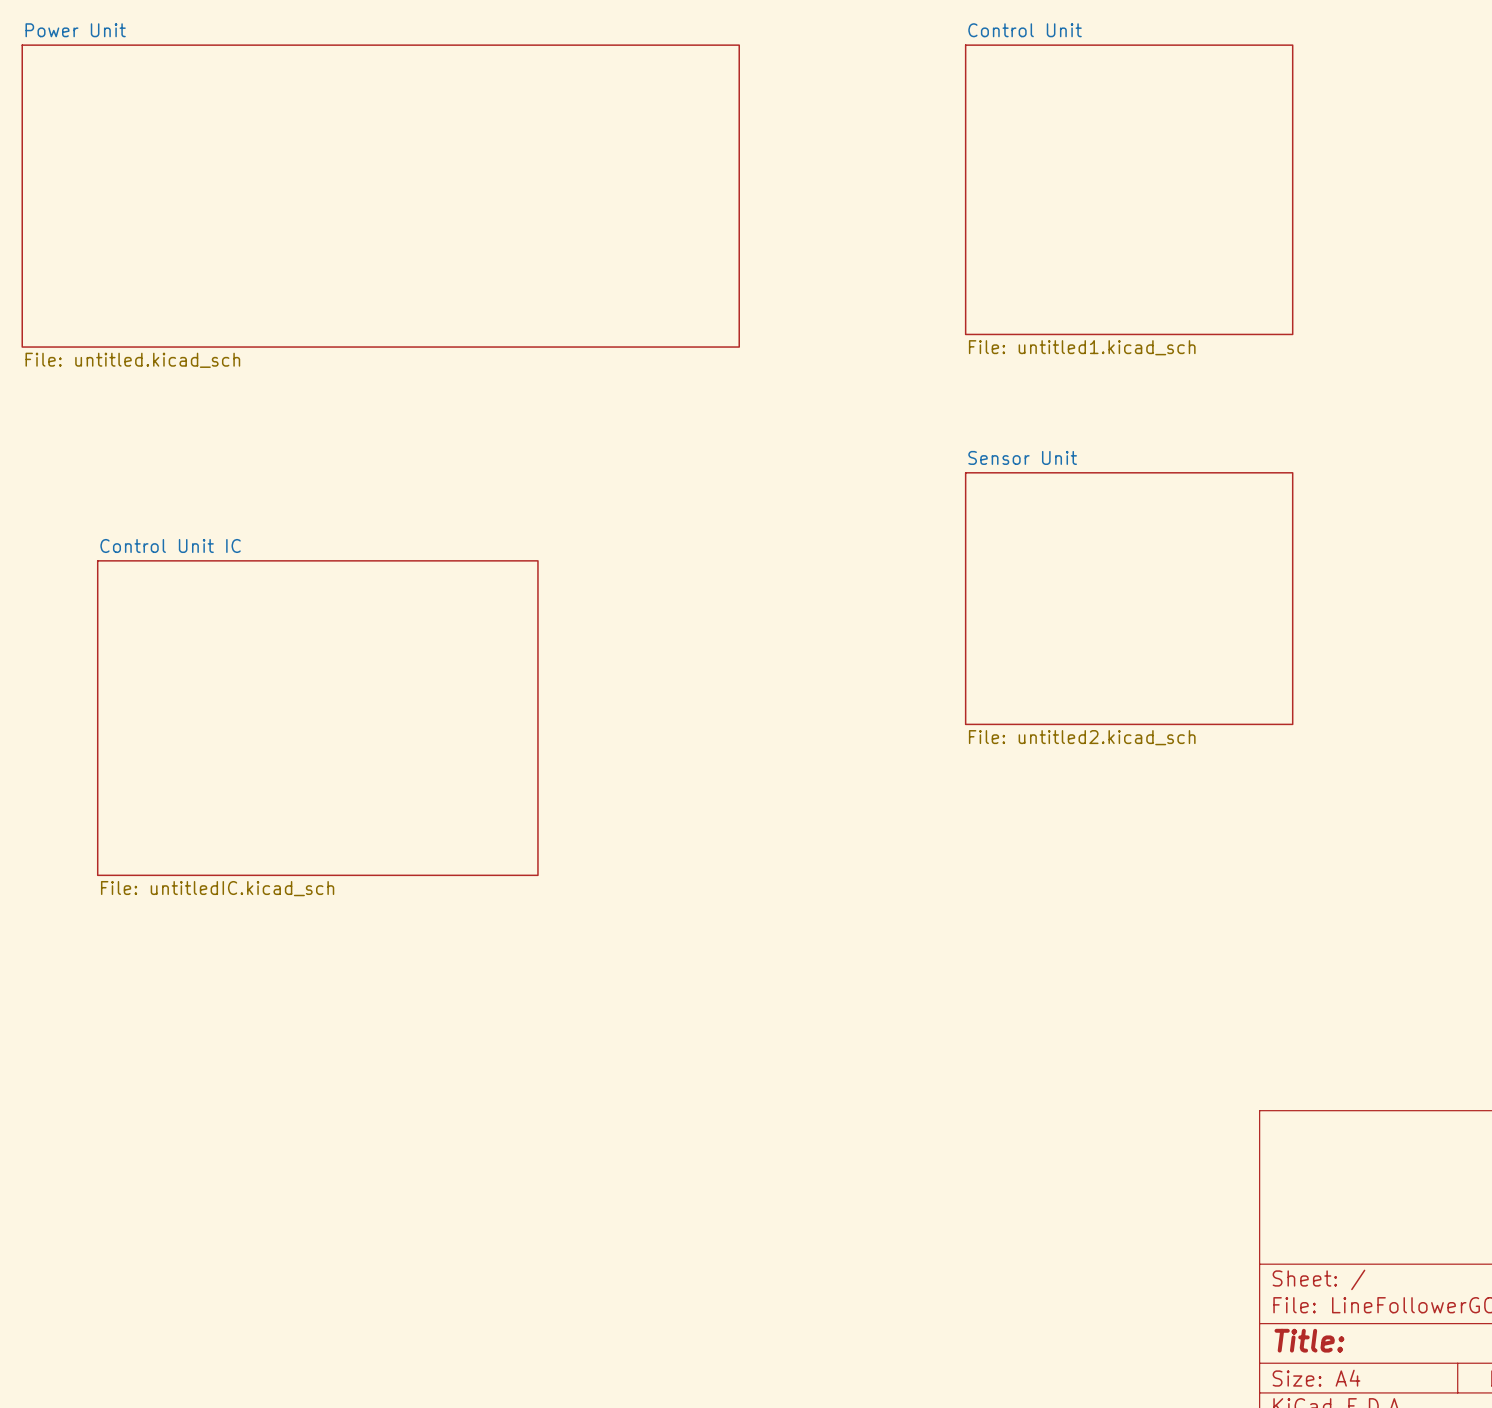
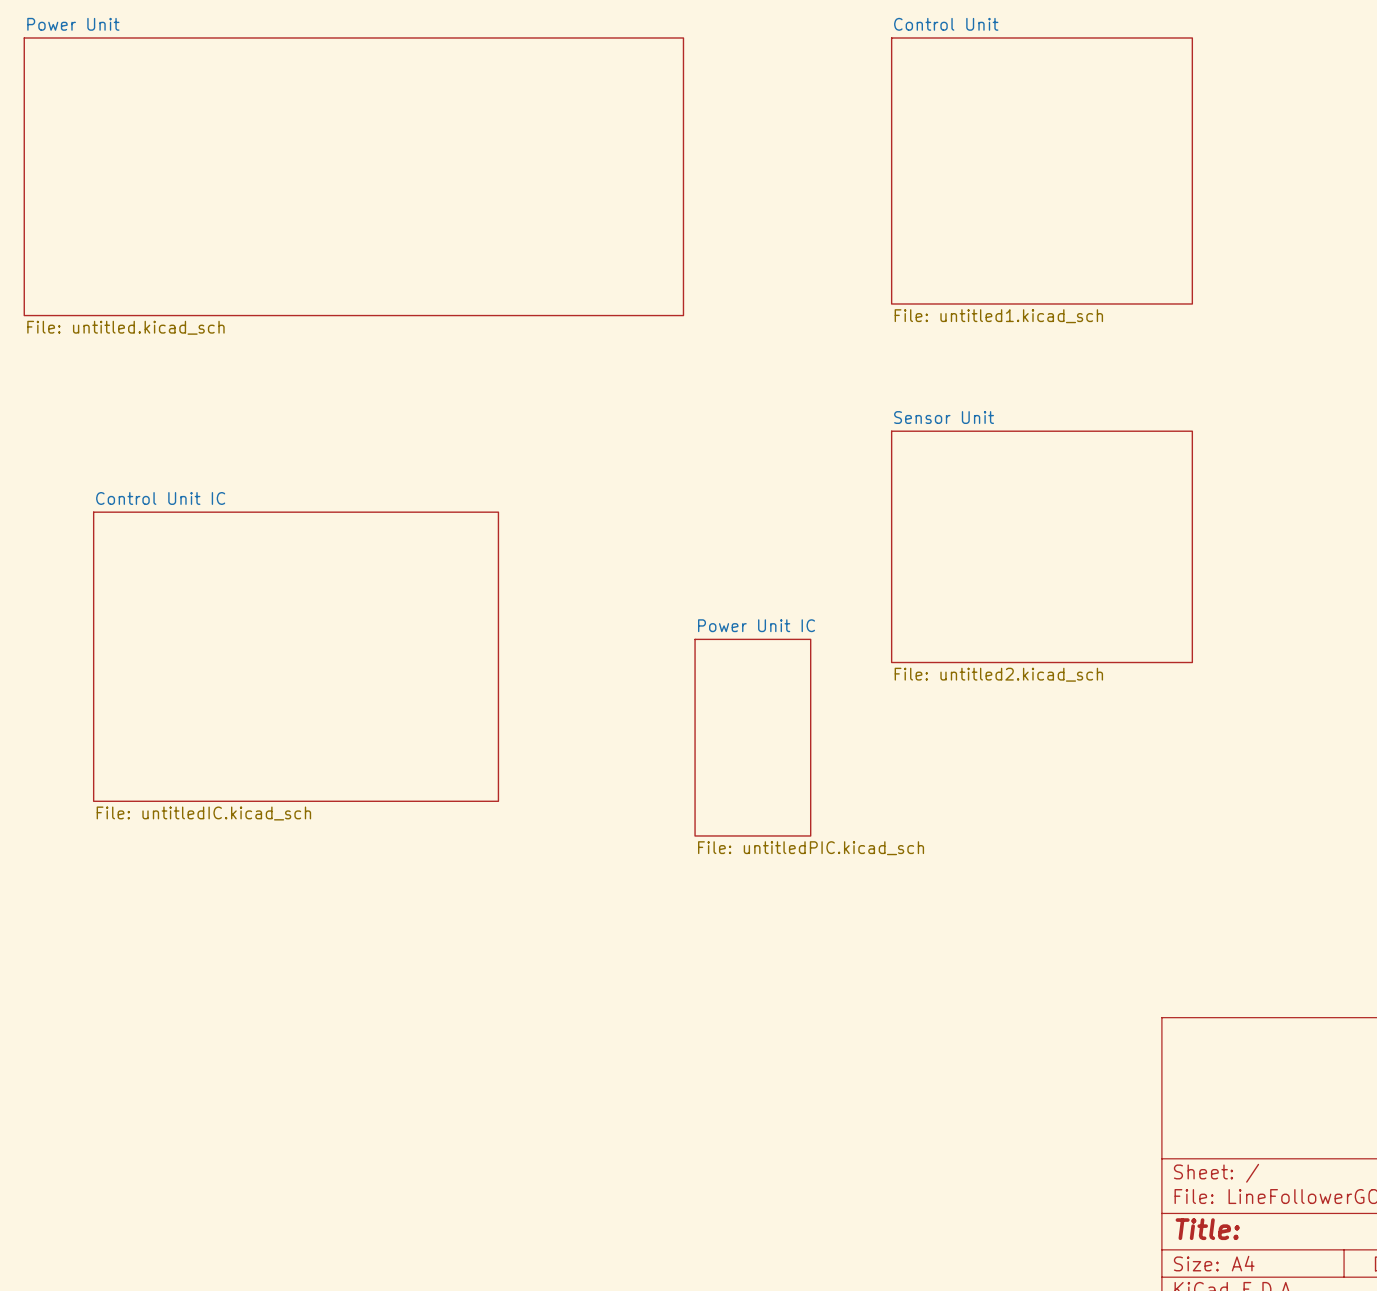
sheet Power Unit IC: none -> File: untitledPIC.kicad_sch (752, 737)

